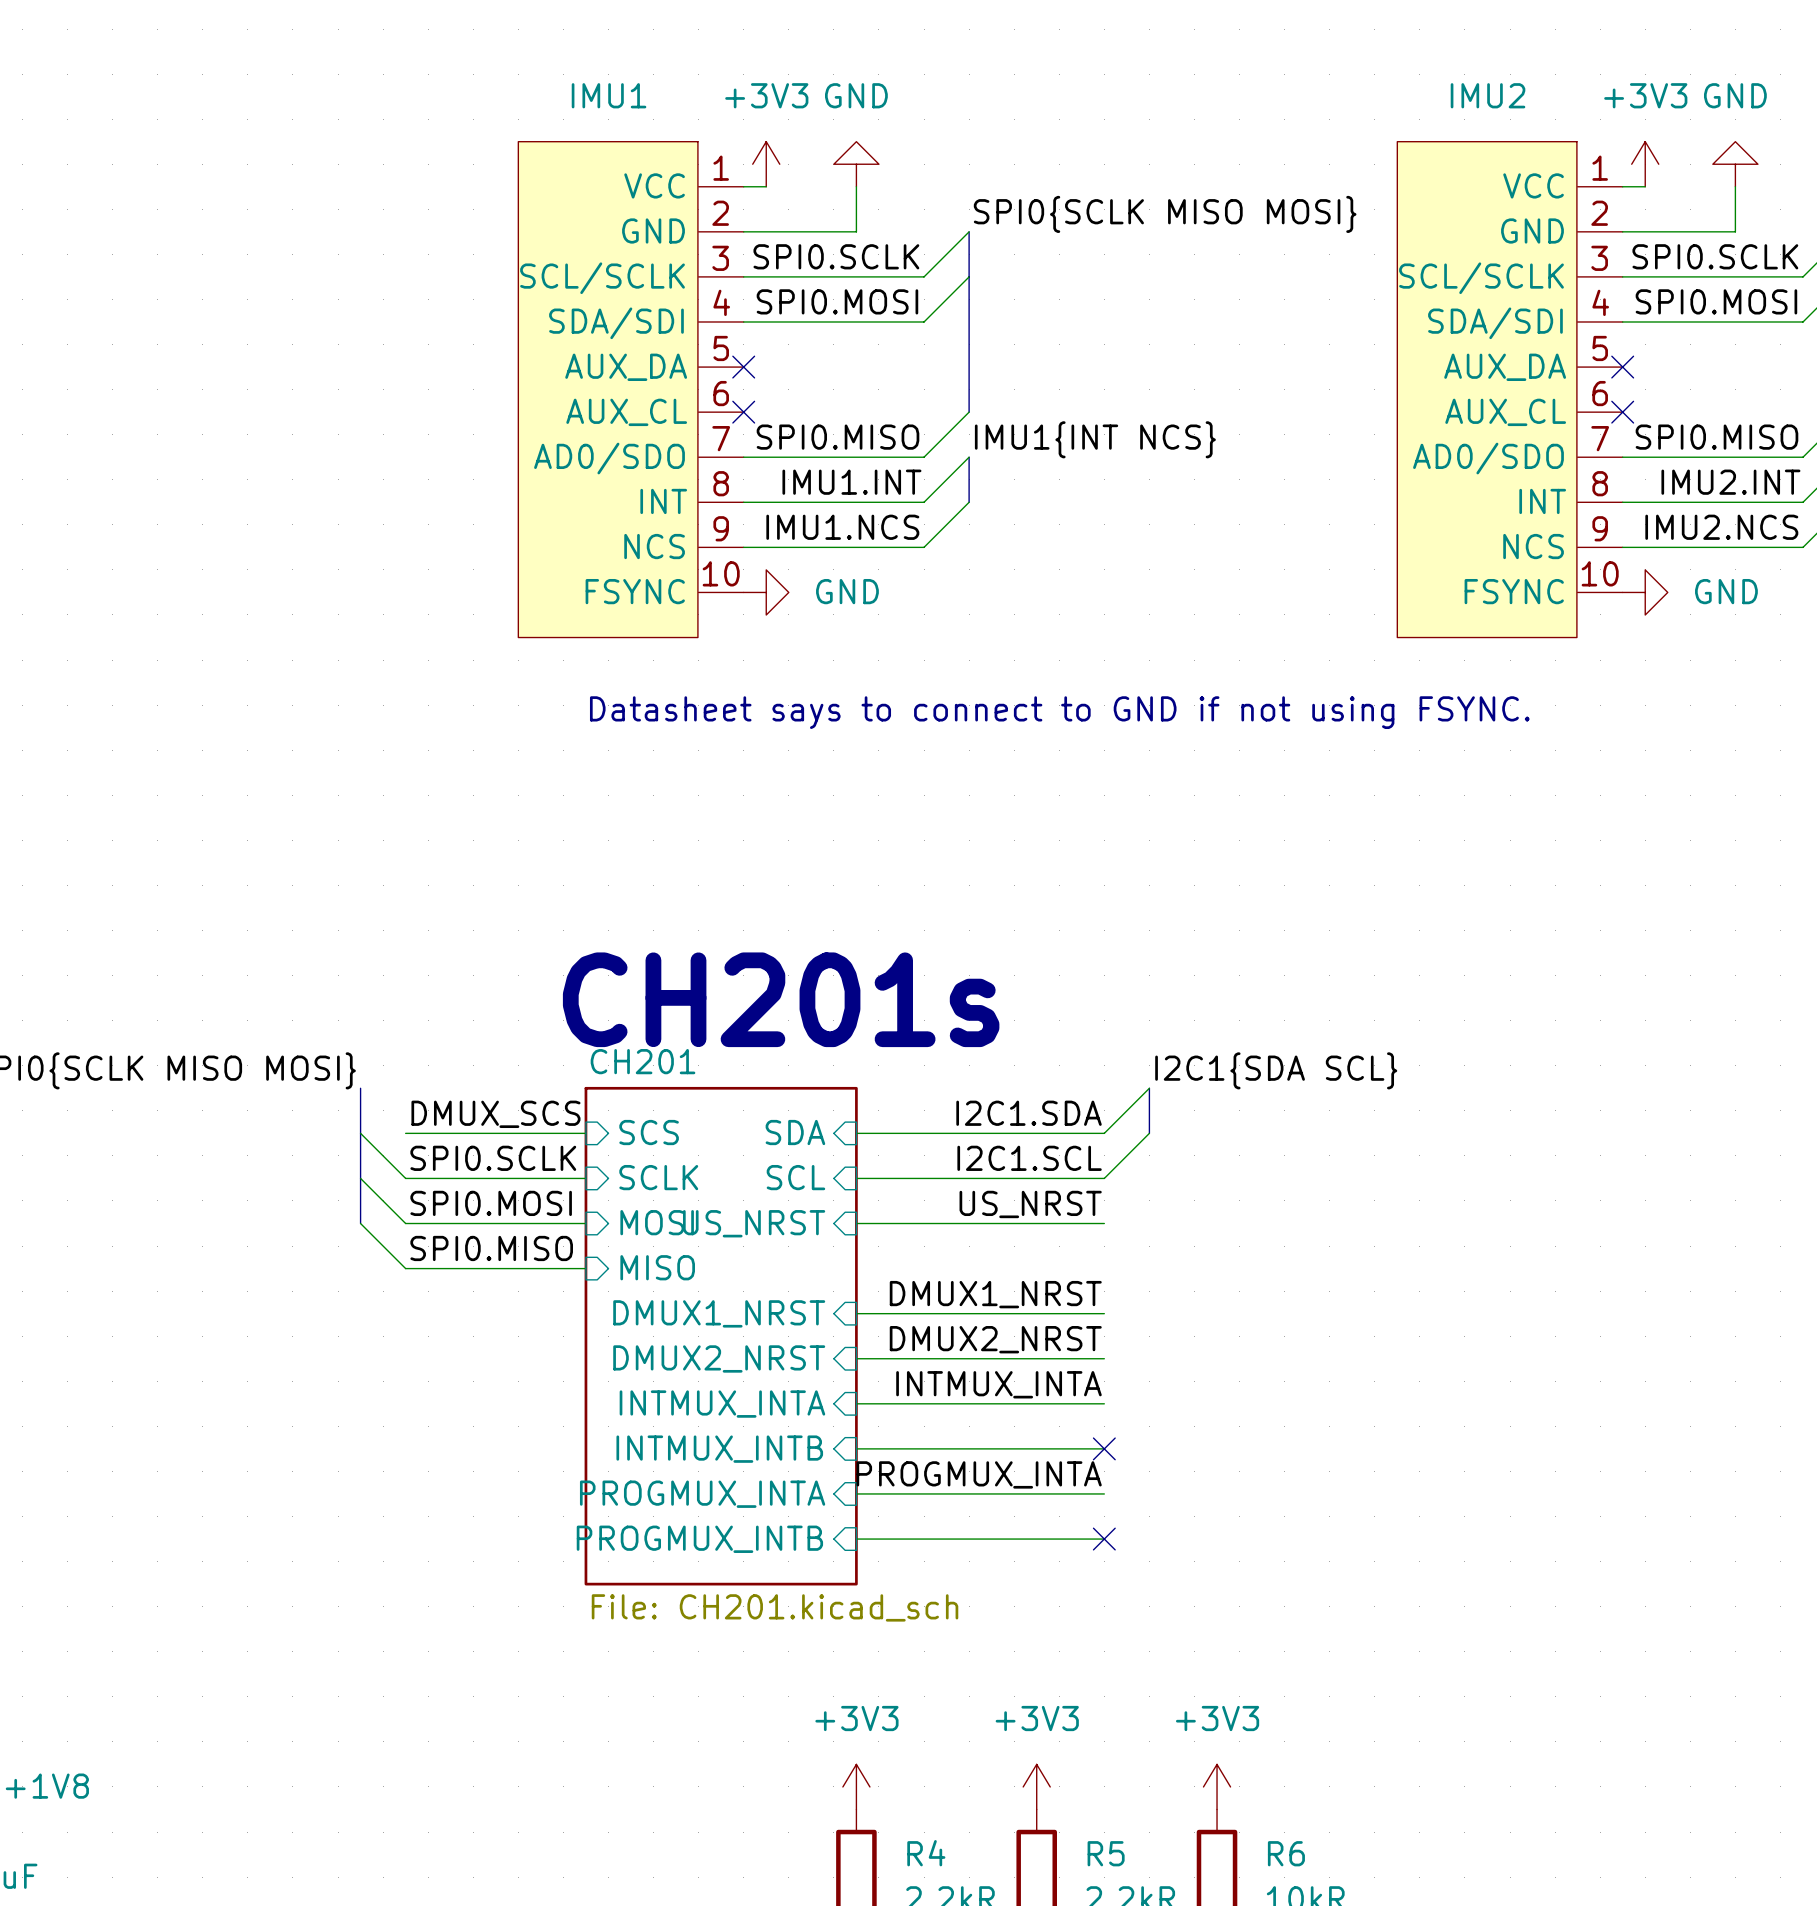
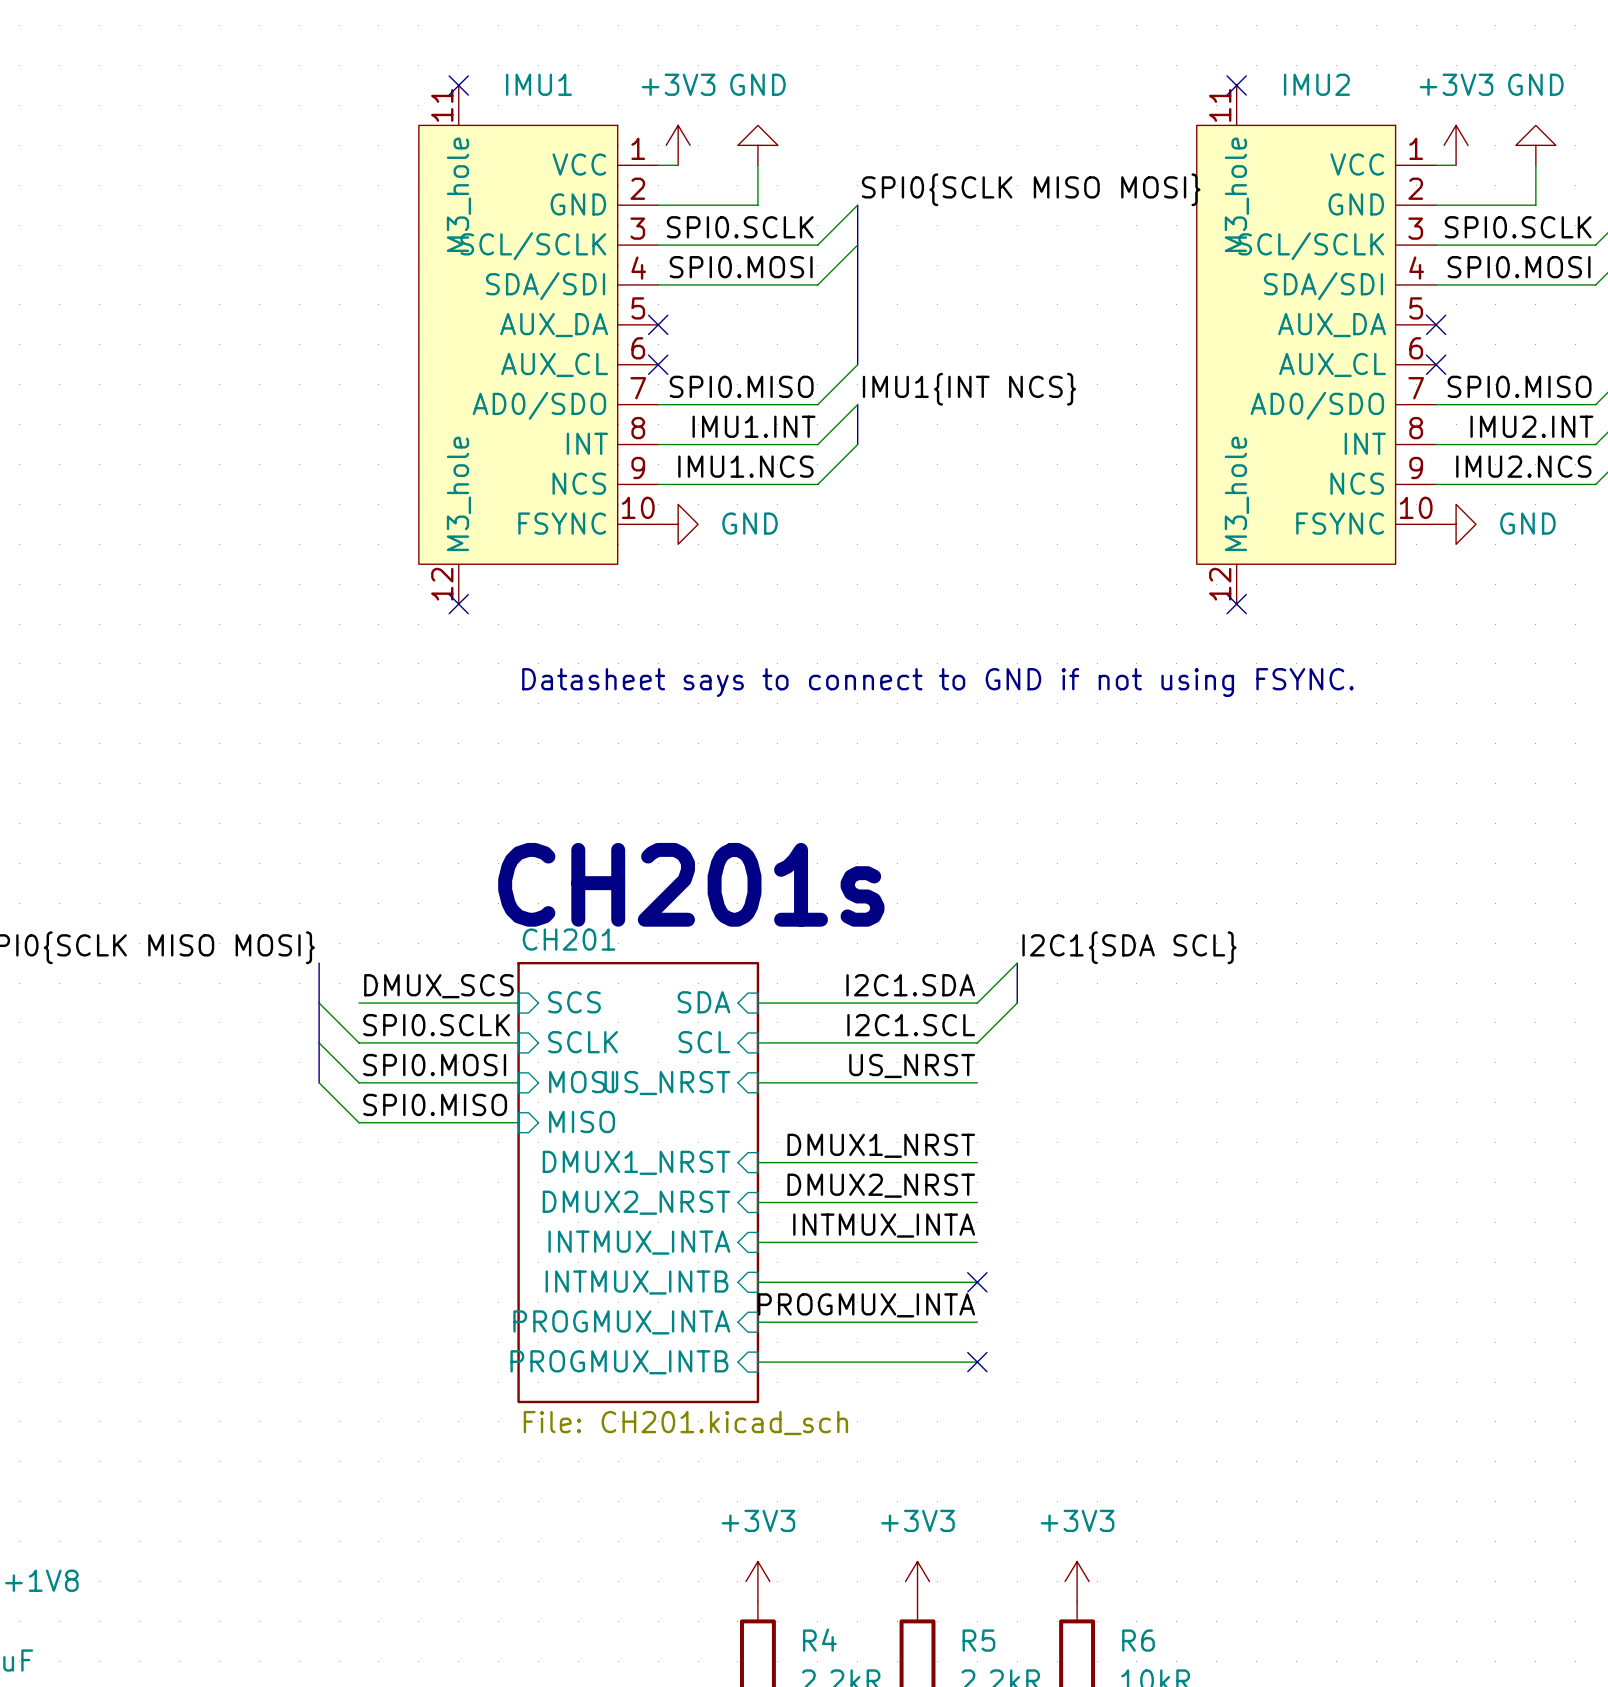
no-connect mark: none -> (458, 85)
no-connect mark: none -> (1236, 85)
IMU1 symbol: [518, 141, 744, 638] -> [418, 85, 659, 605]
IMU2 symbol: [1397, 141, 1623, 638] -> [1196, 85, 1437, 605]
no-connect mark: none -> (458, 604)
no-connect mark: none -> (1236, 604)
text position: Datasheet says to connect to GND if not using FSYNC. (1059, 712) -> Datasheet says to connect to GND if not using FSYNC. (937, 682)

